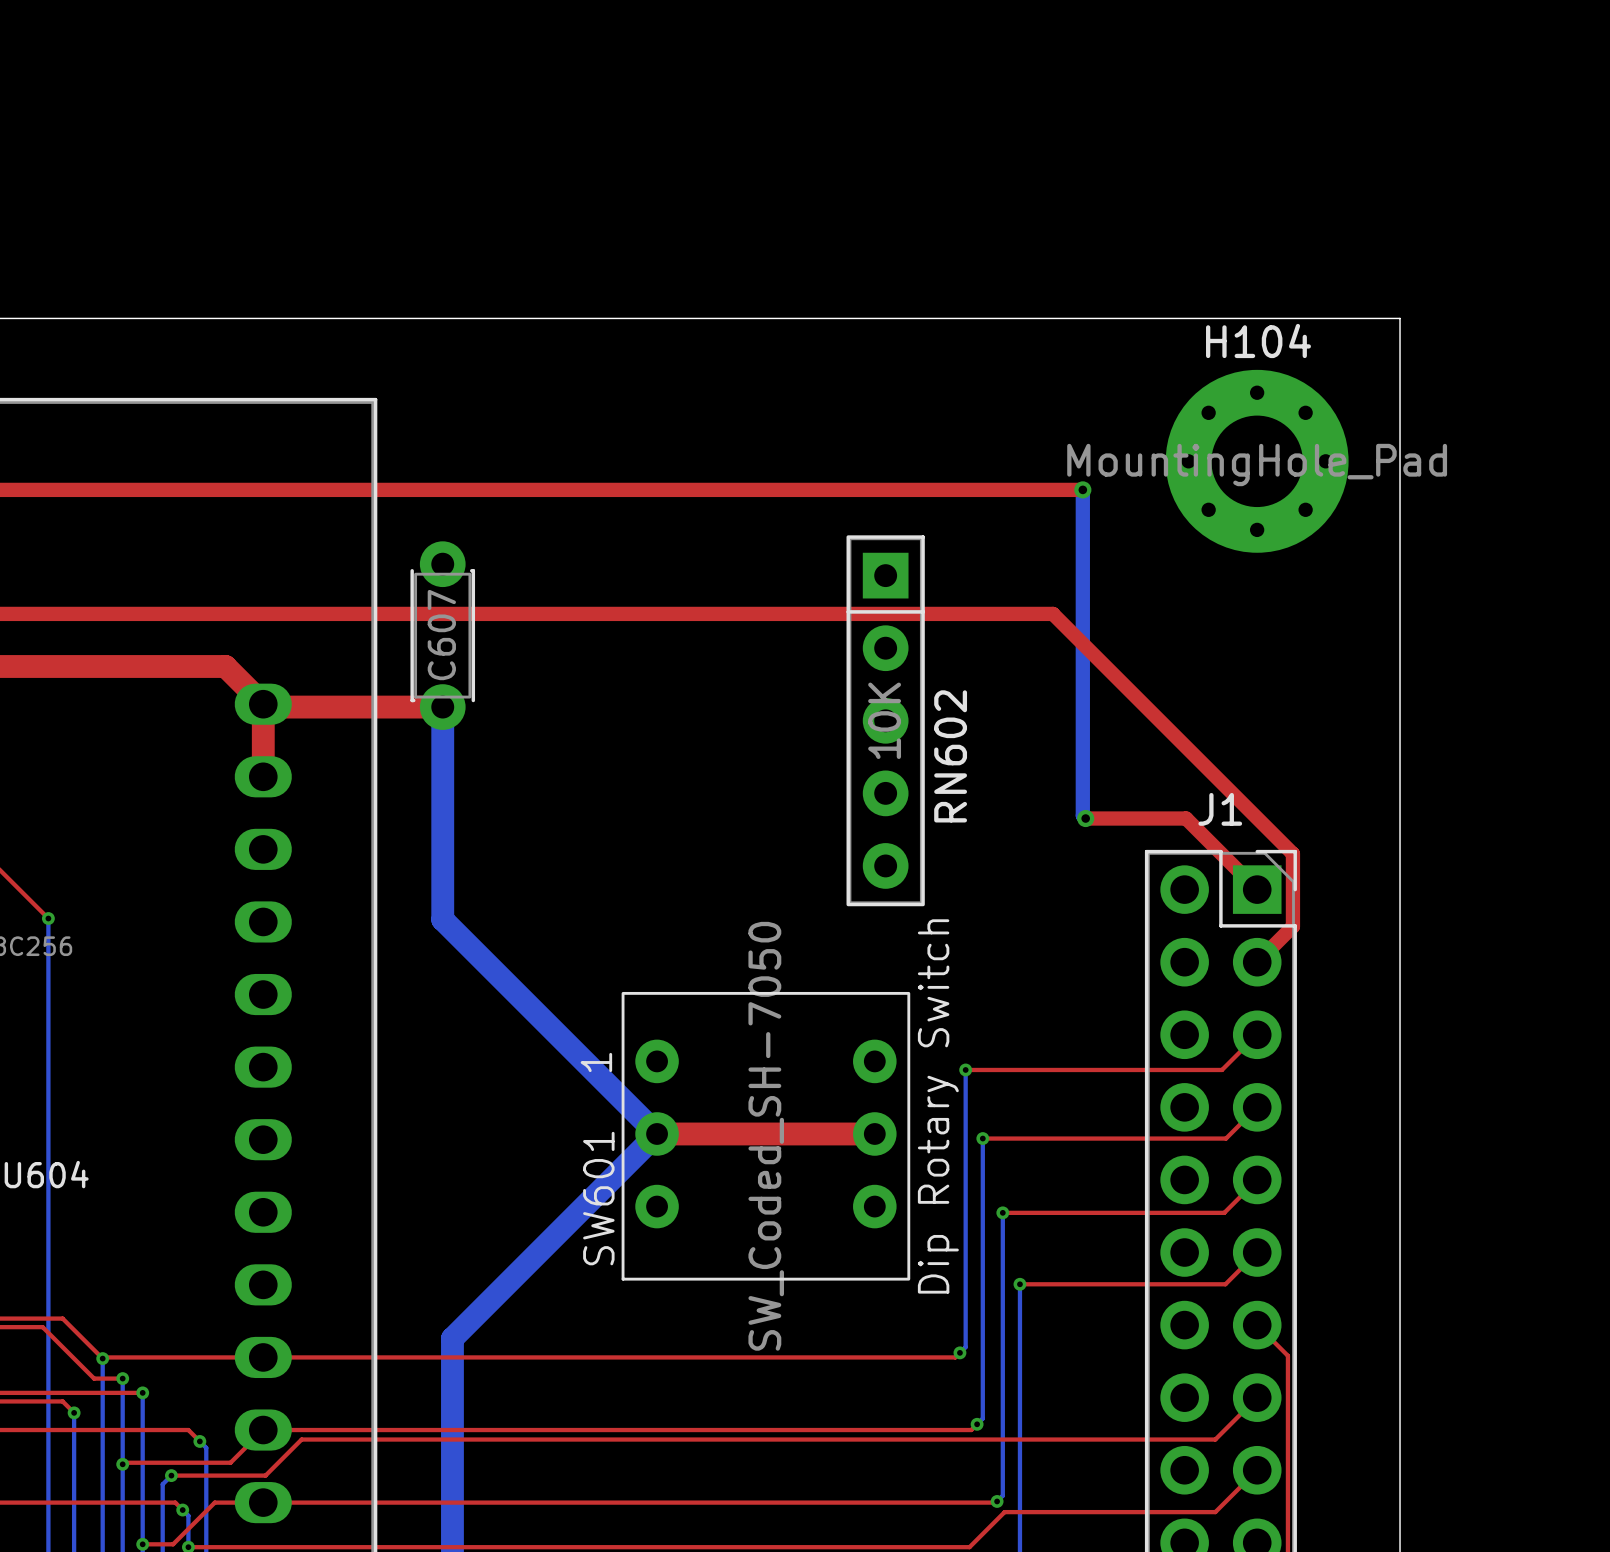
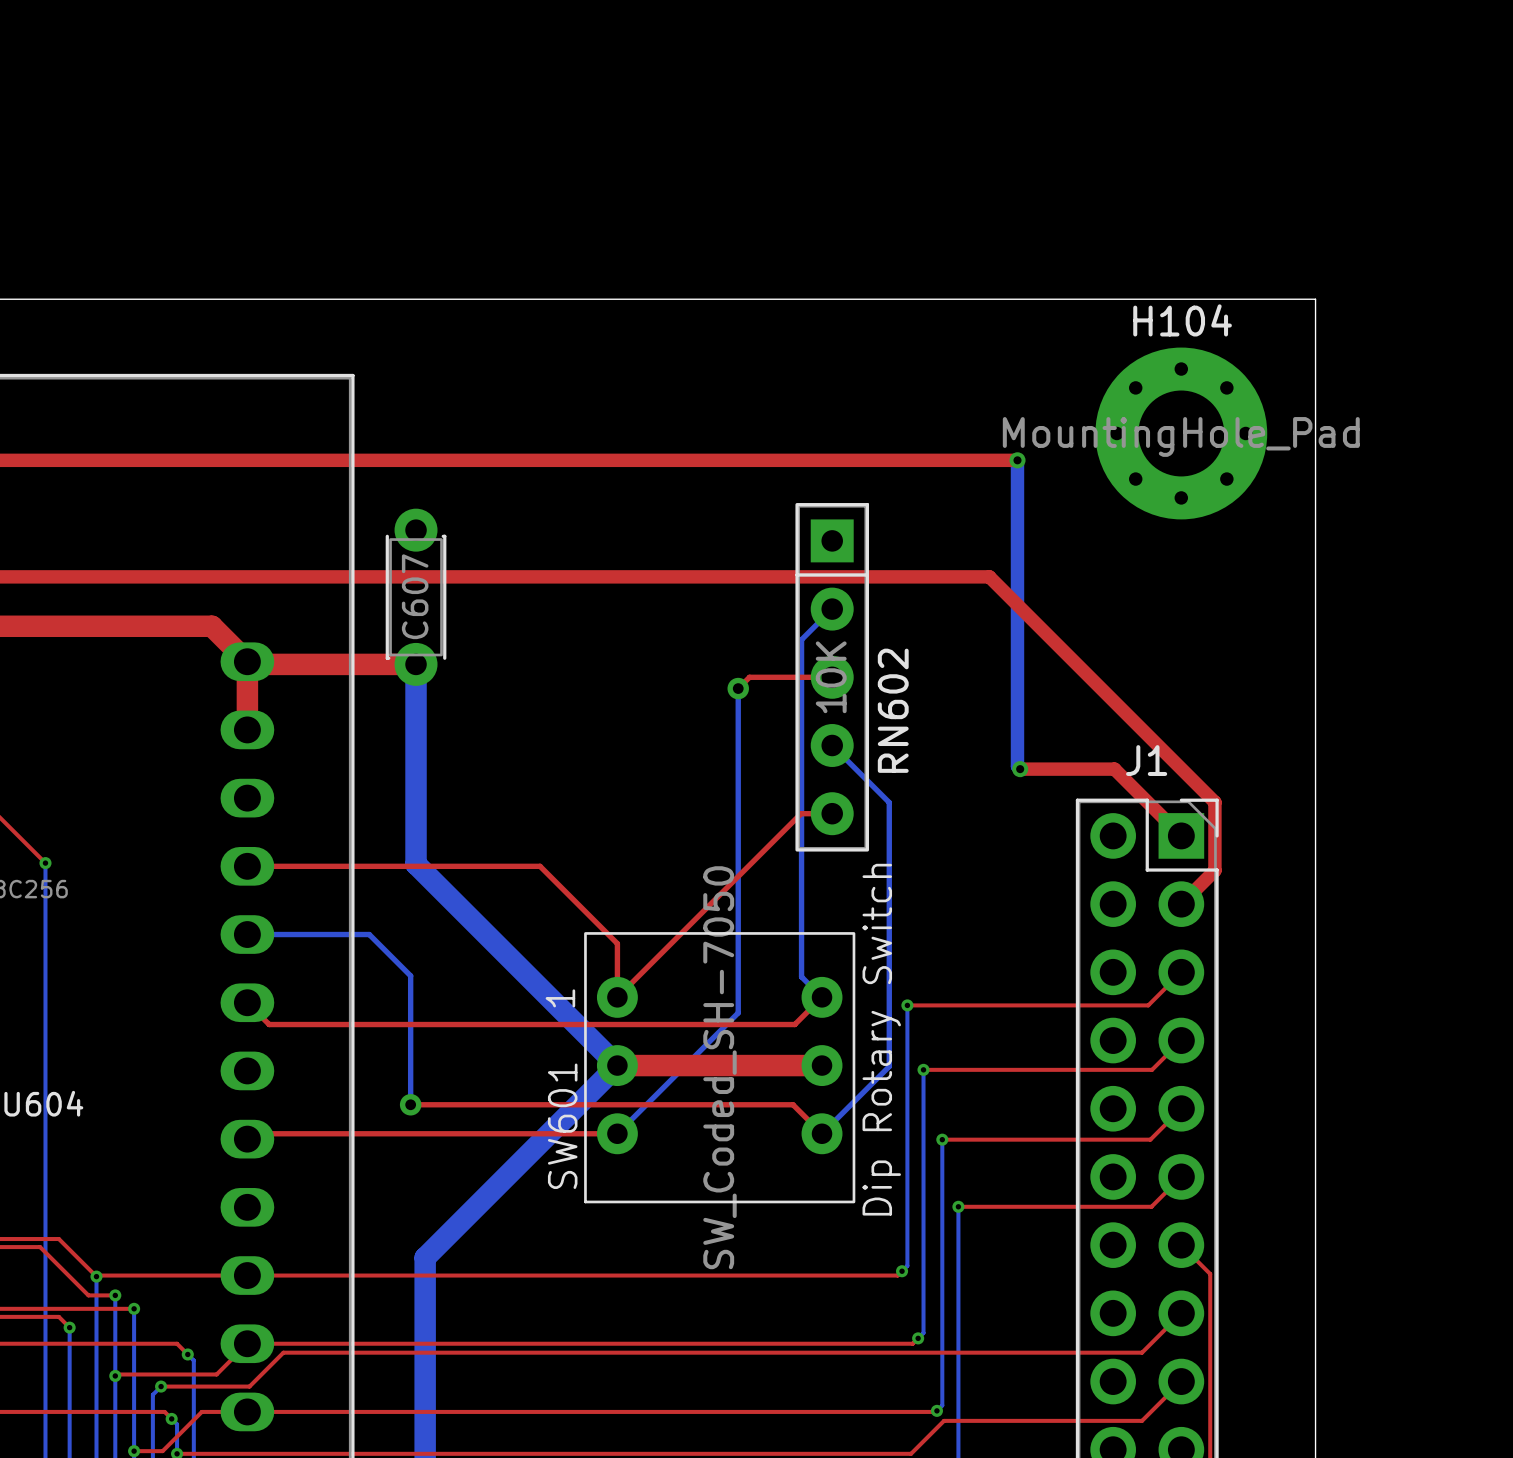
bottom track: none -> (832, 609) (801, 639) (801, 976) (822, 997)
top track: none -> (832, 677) (749, 677) (738, 688)
bottom track: none -> (738, 688) (738, 1012) (617, 1133)
via: none -> (738, 688)
bottom track: none -> (832, 745) (889, 802) (889, 1066) (822, 1133)
top track: none -> (832, 813) (801, 813) (617, 997) (617, 943) (540, 866) (247, 866)
bottom track: none -> (247, 934) (369, 934) (410, 975) (410, 1104)
top track: none -> (822, 997) (794, 1024) (269, 1024) (247, 1002)
top track: none -> (410, 1104) (793, 1104) (822, 1133)
via: none -> (410, 1104)
top track: none -> (617, 1133) (252, 1133) (247, 1139)

